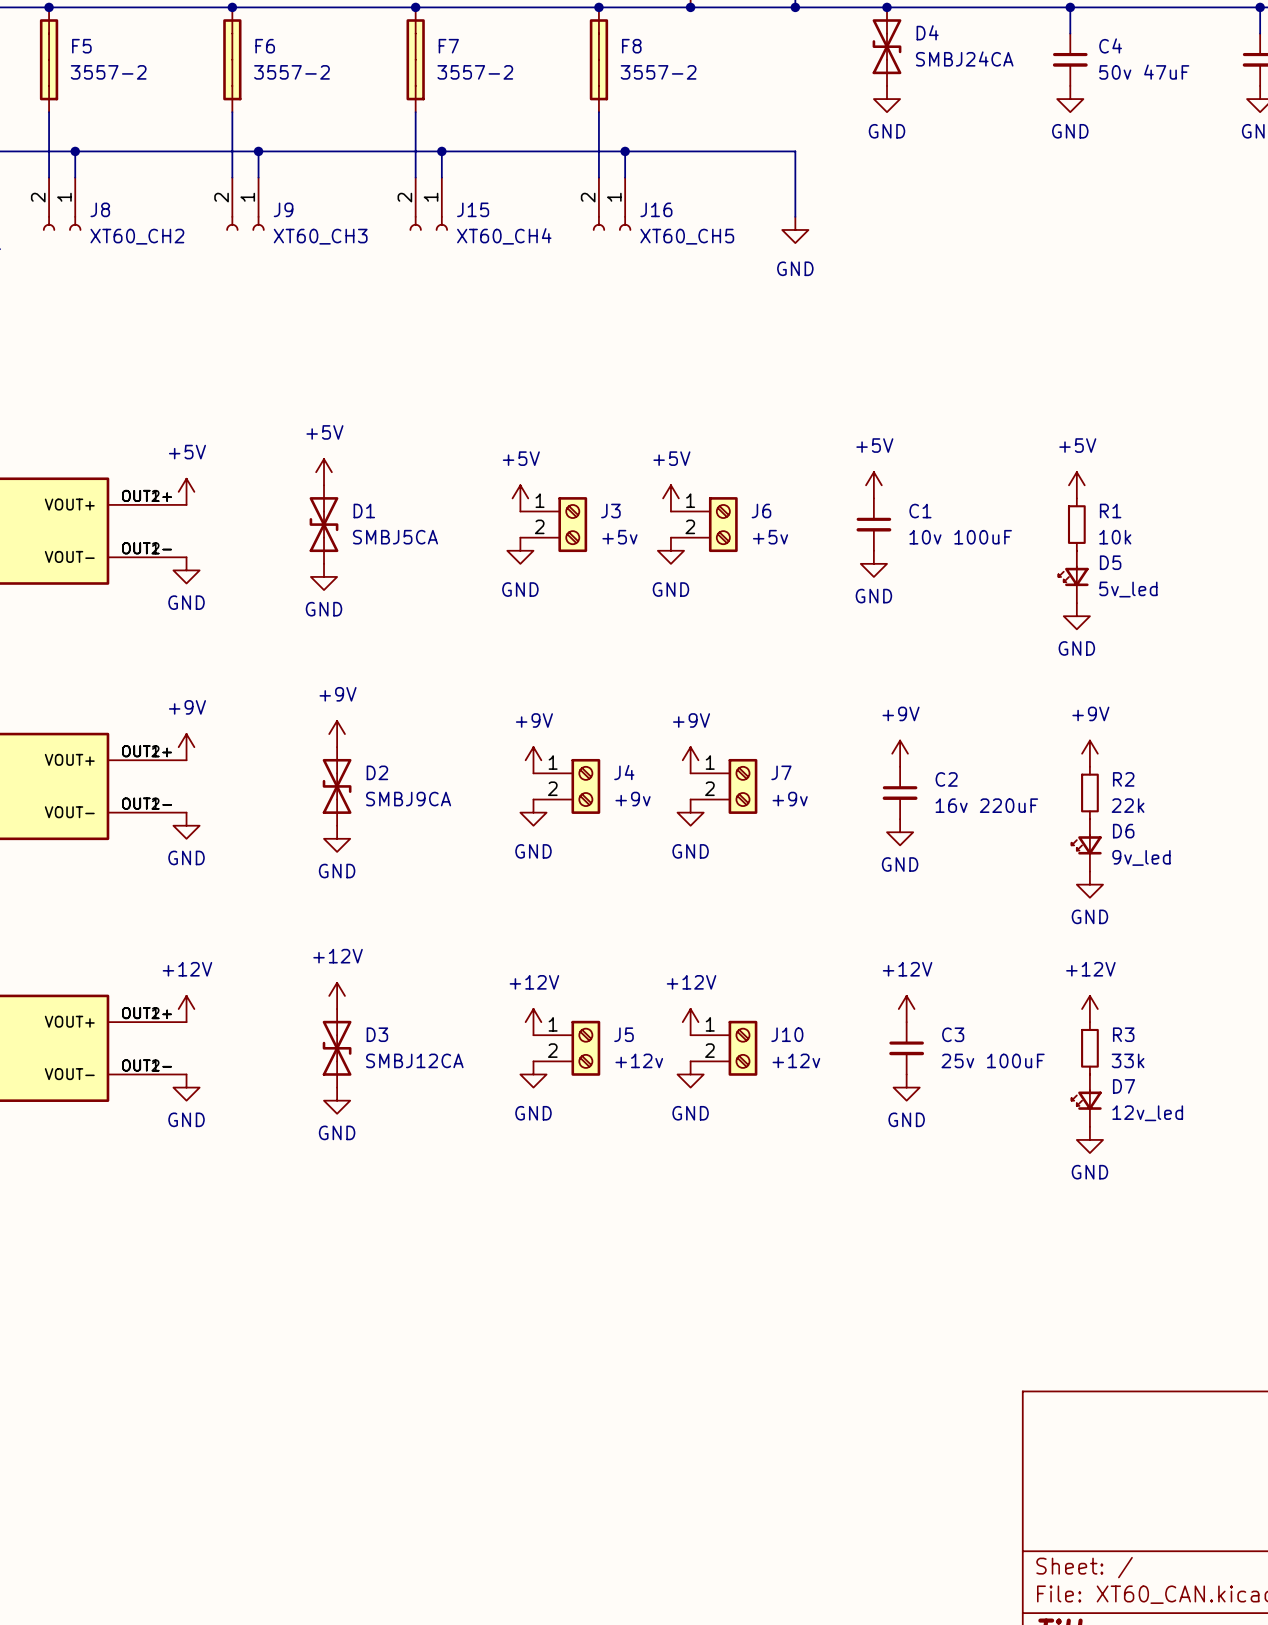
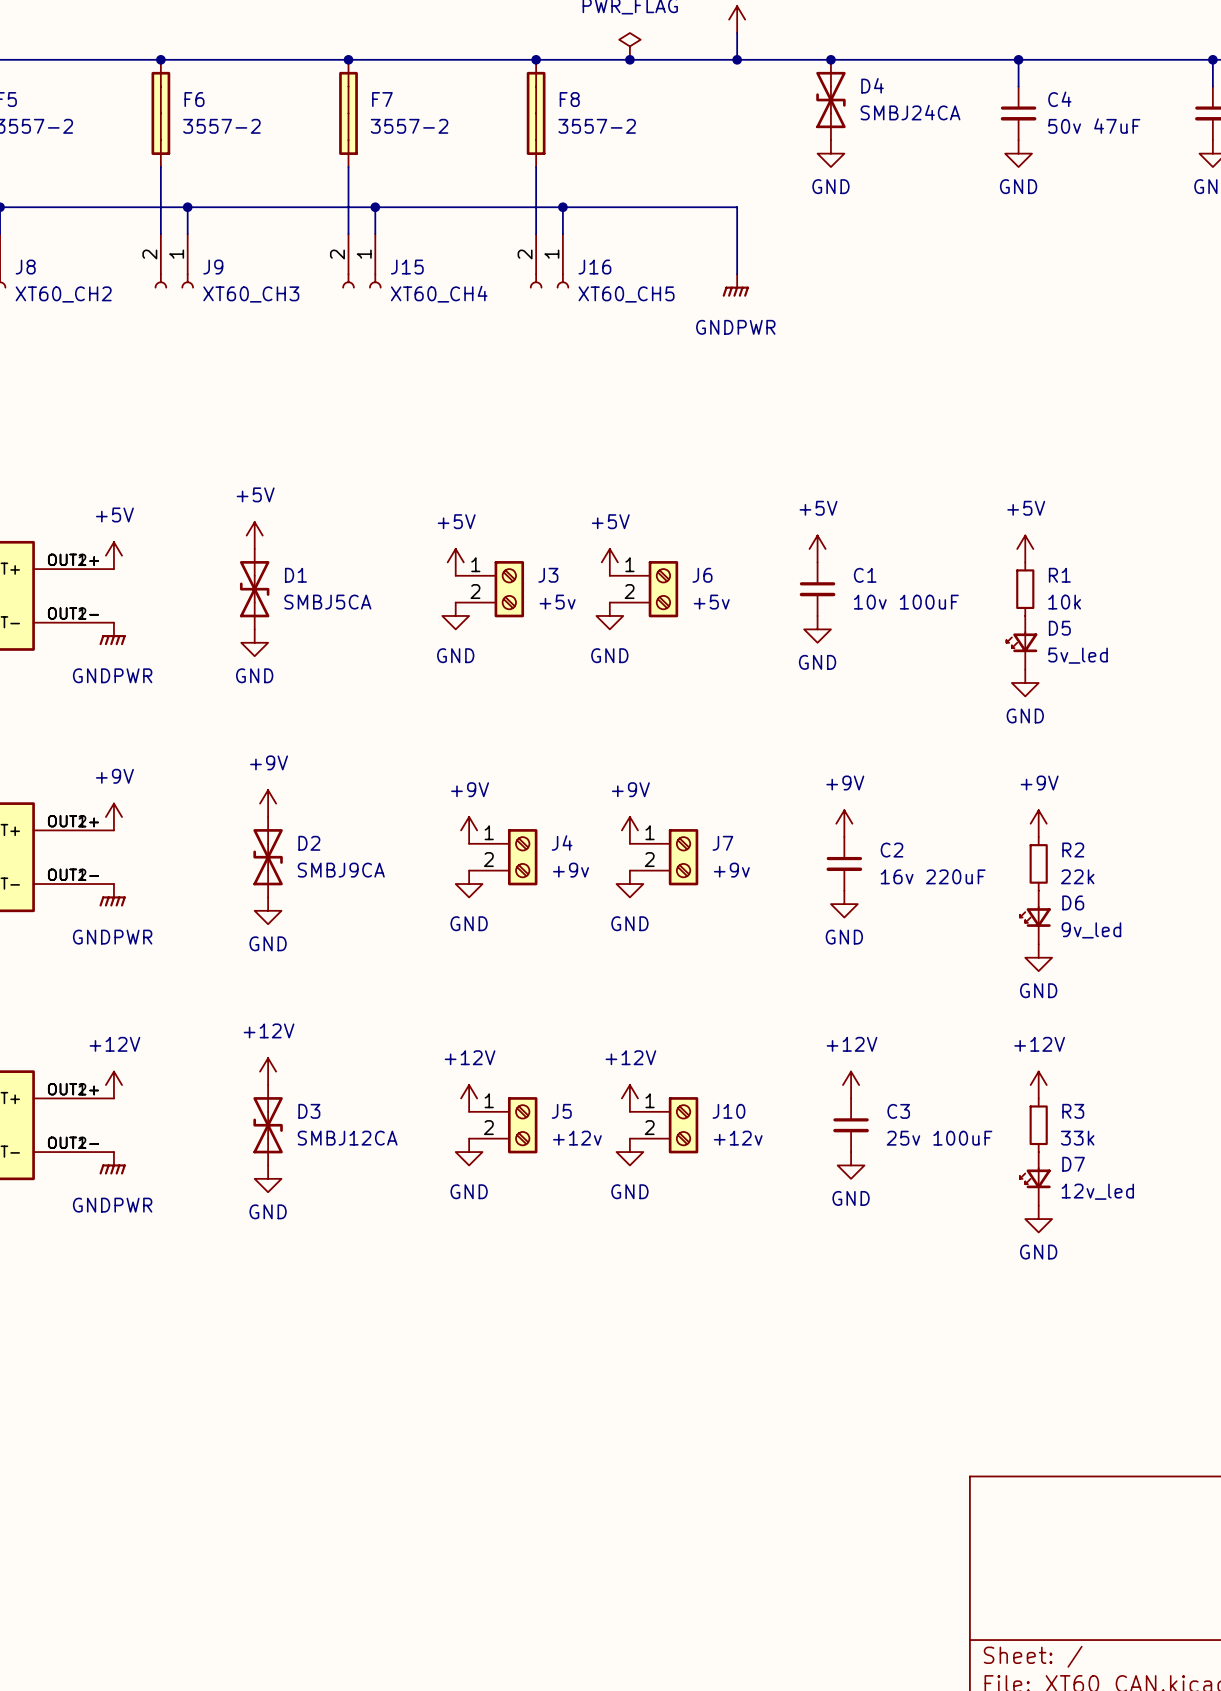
power symbol: GND (795, 229) -> GNDPWR (735, 285)
power symbol: GND (186, 570) -> GNDPWR (112, 633)
power symbol: GND (186, 825) -> GNDPWR (112, 895)
power symbol: GND (186, 1087) -> GNDPWR (112, 1163)

